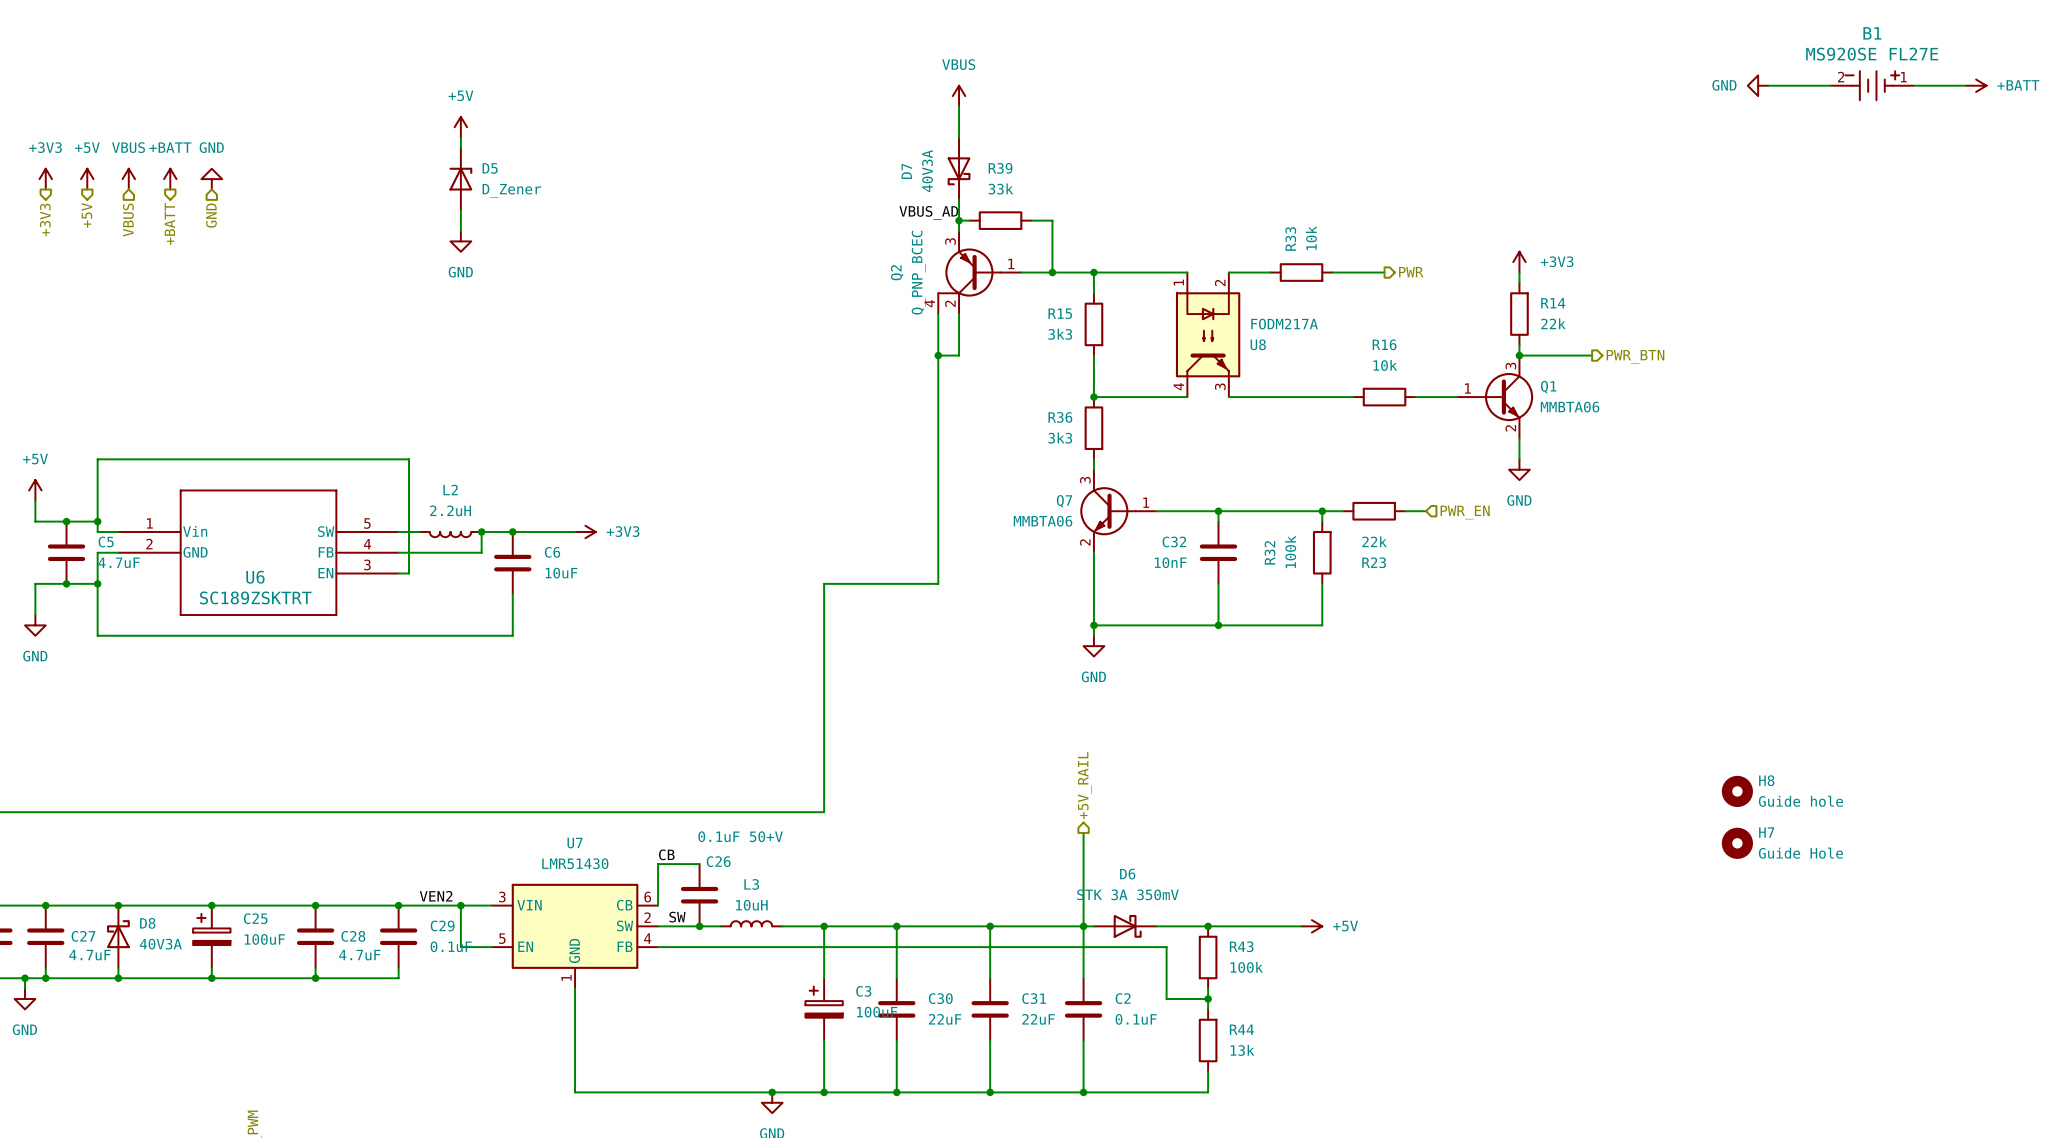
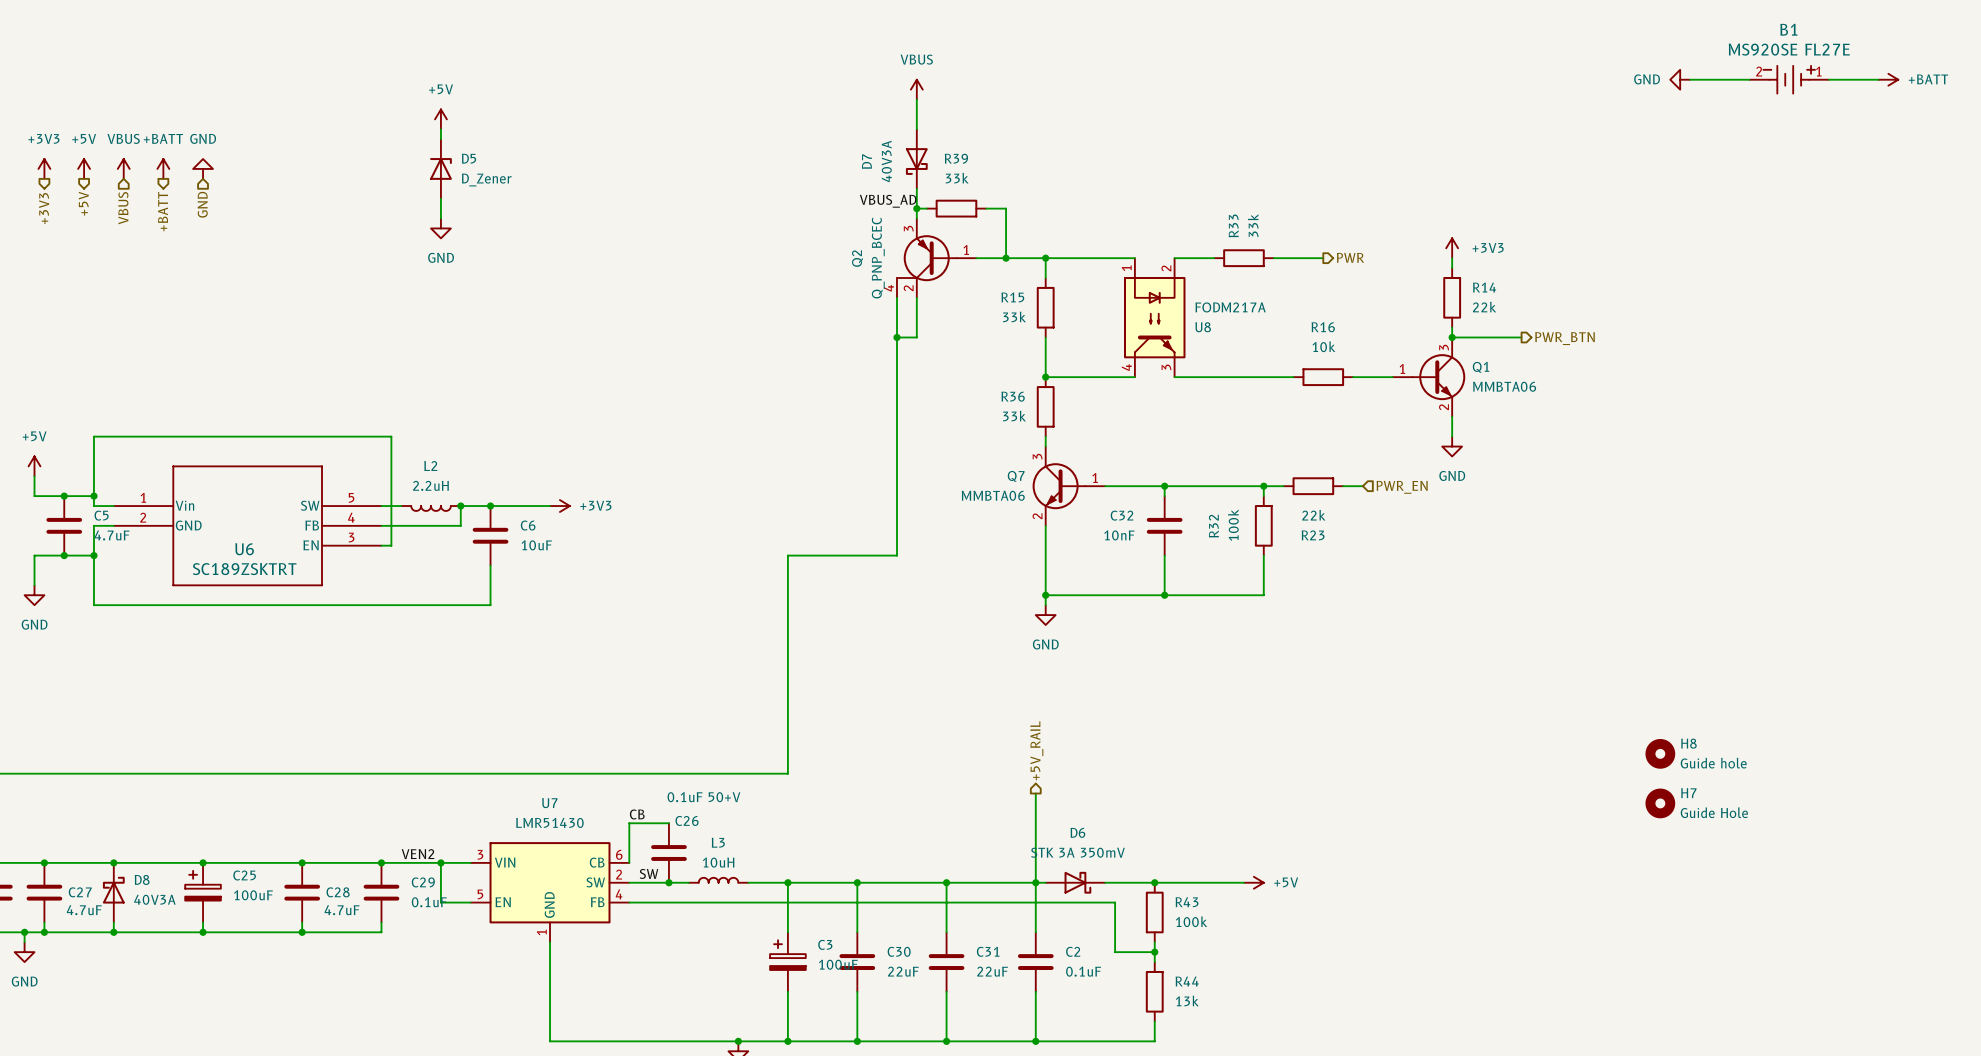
R33 value: 10k (1311, 238) -> 33k (1253, 225)
R15 value: 3k3 (1060, 334) -> 33k (1014, 316)
R36 value: 3k3 (1060, 438) -> 33k (1014, 416)

